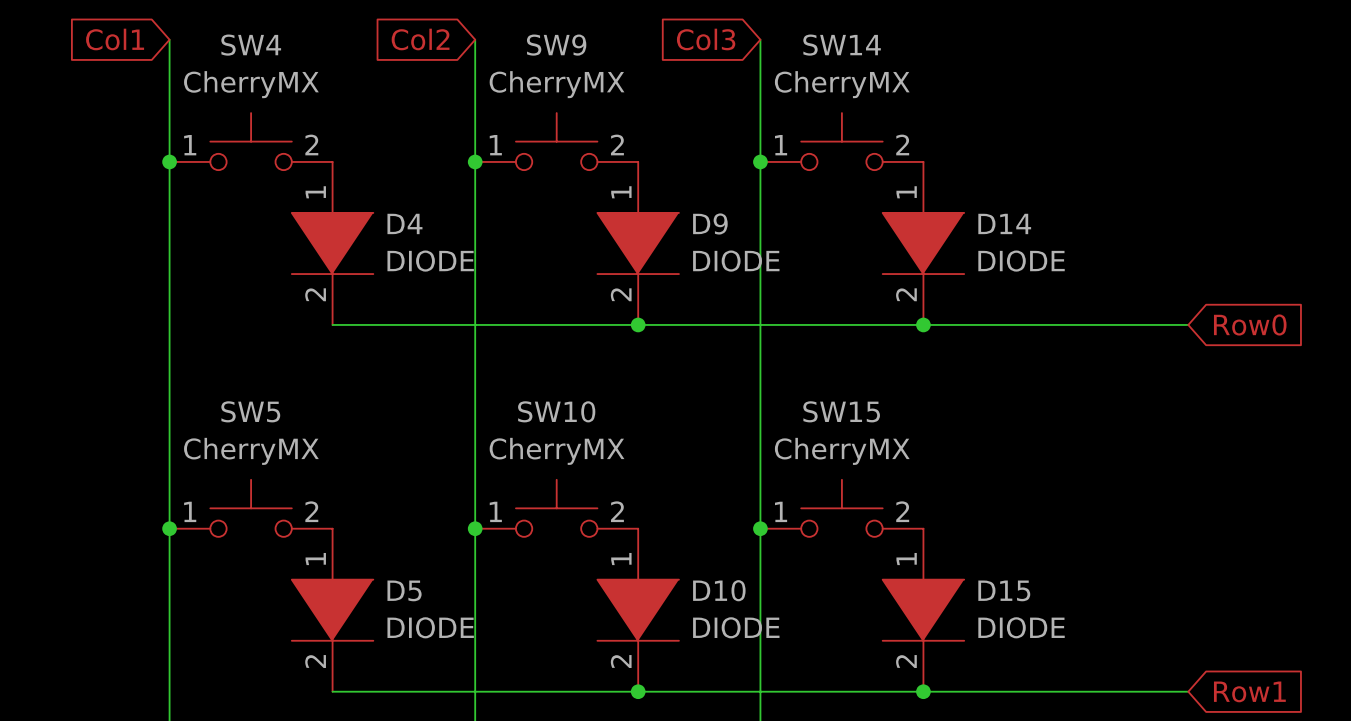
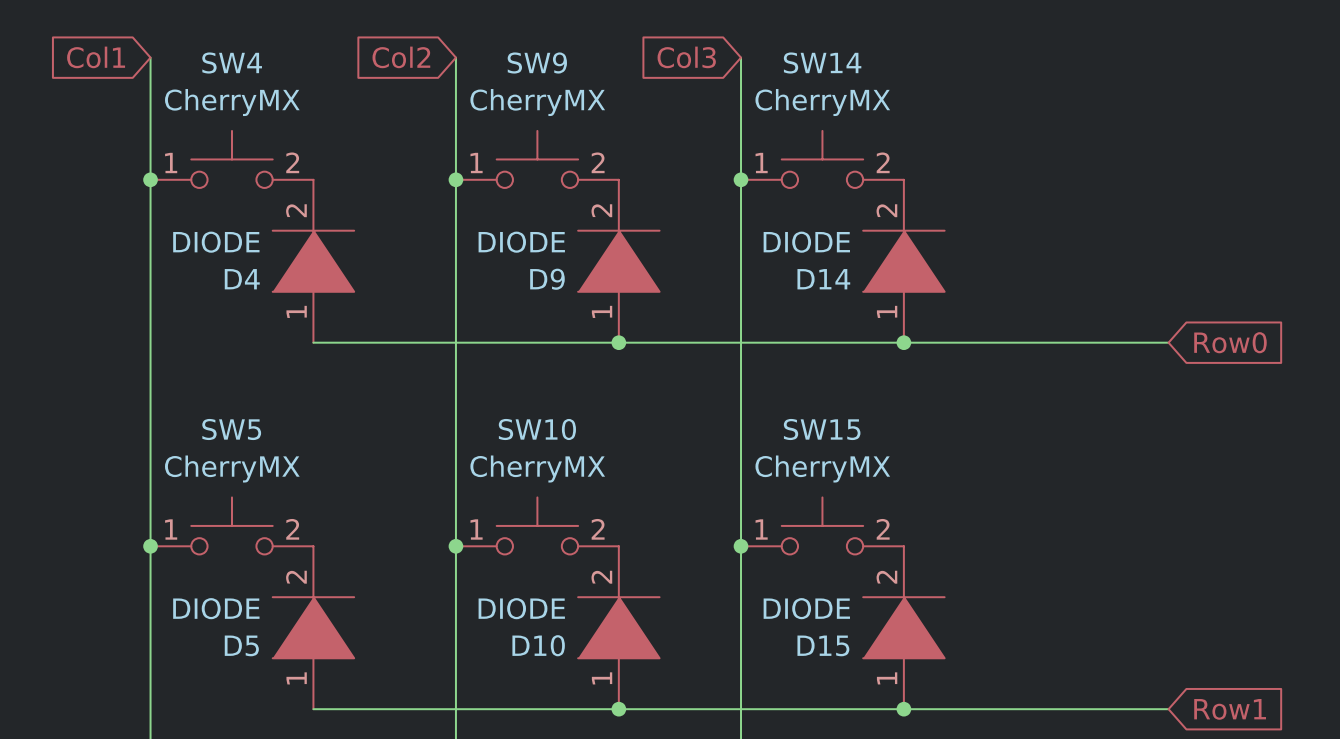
D4 rotation: 0° (332, 243) -> 180° (313, 261)
D9 rotation: 0° (638, 243) -> 180° (618, 261)
D14 rotation: 0° (923, 243) -> 180° (903, 261)
D5 rotation: 0° (332, 610) -> 180° (313, 627)
D10 rotation: 0° (638, 610) -> 180° (618, 627)
D15 rotation: 0° (923, 610) -> 180° (903, 627)

